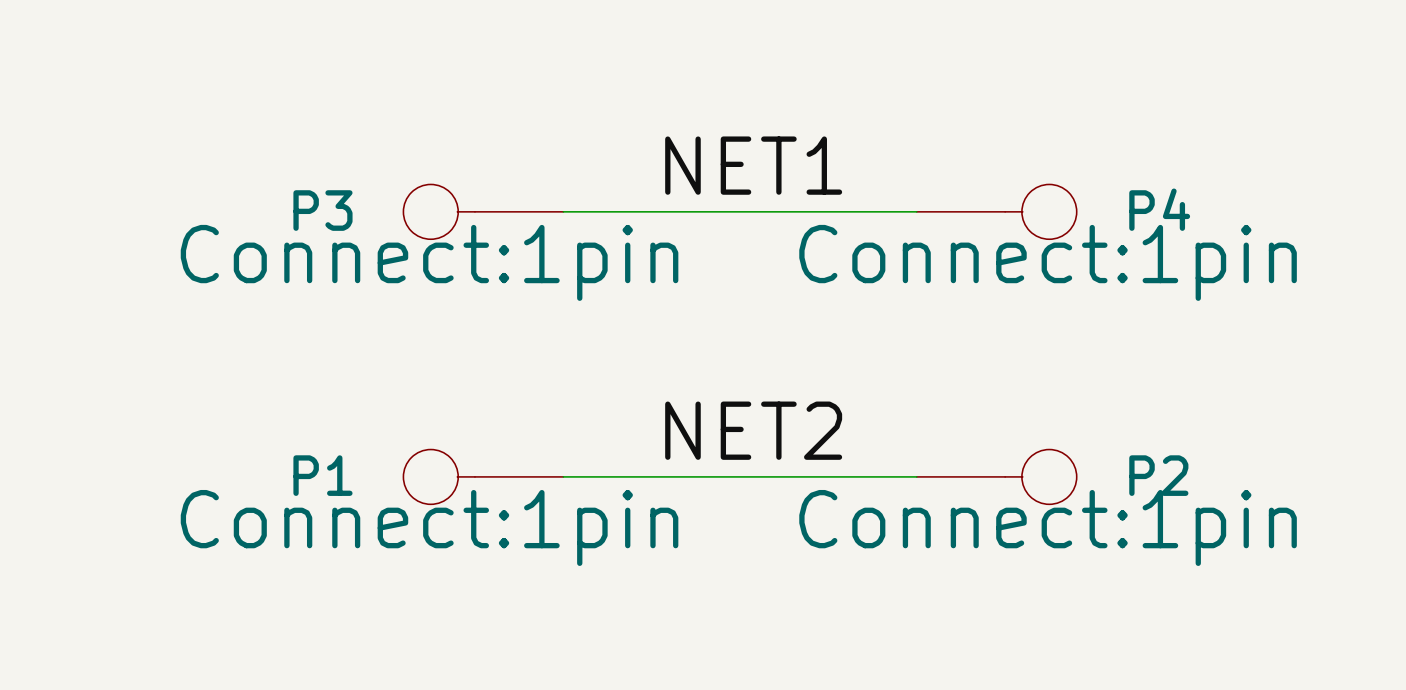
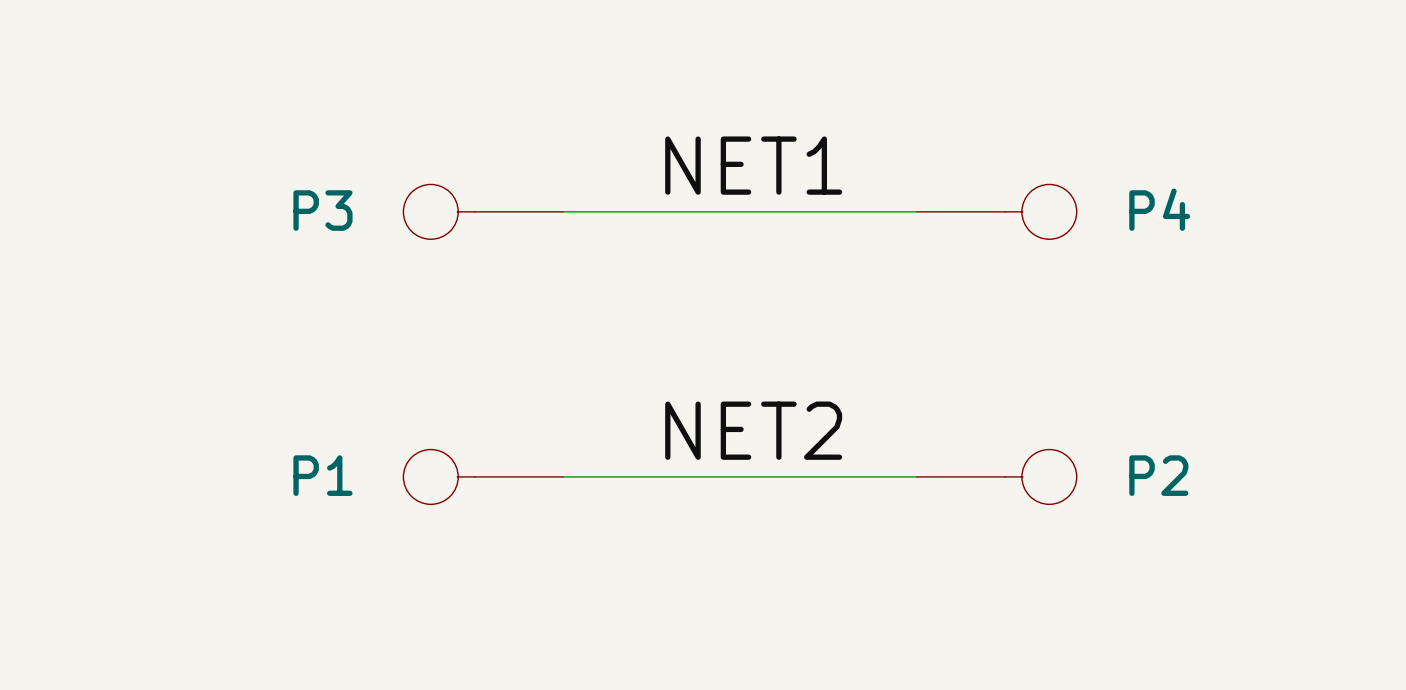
P3 text: Connect:1pin (429, 262) -> none
P4 text: Connect:1pin (1048, 262) -> none
P1 text: Connect:1pin (429, 527) -> none
P2 text: Connect:1pin (1048, 527) -> none

